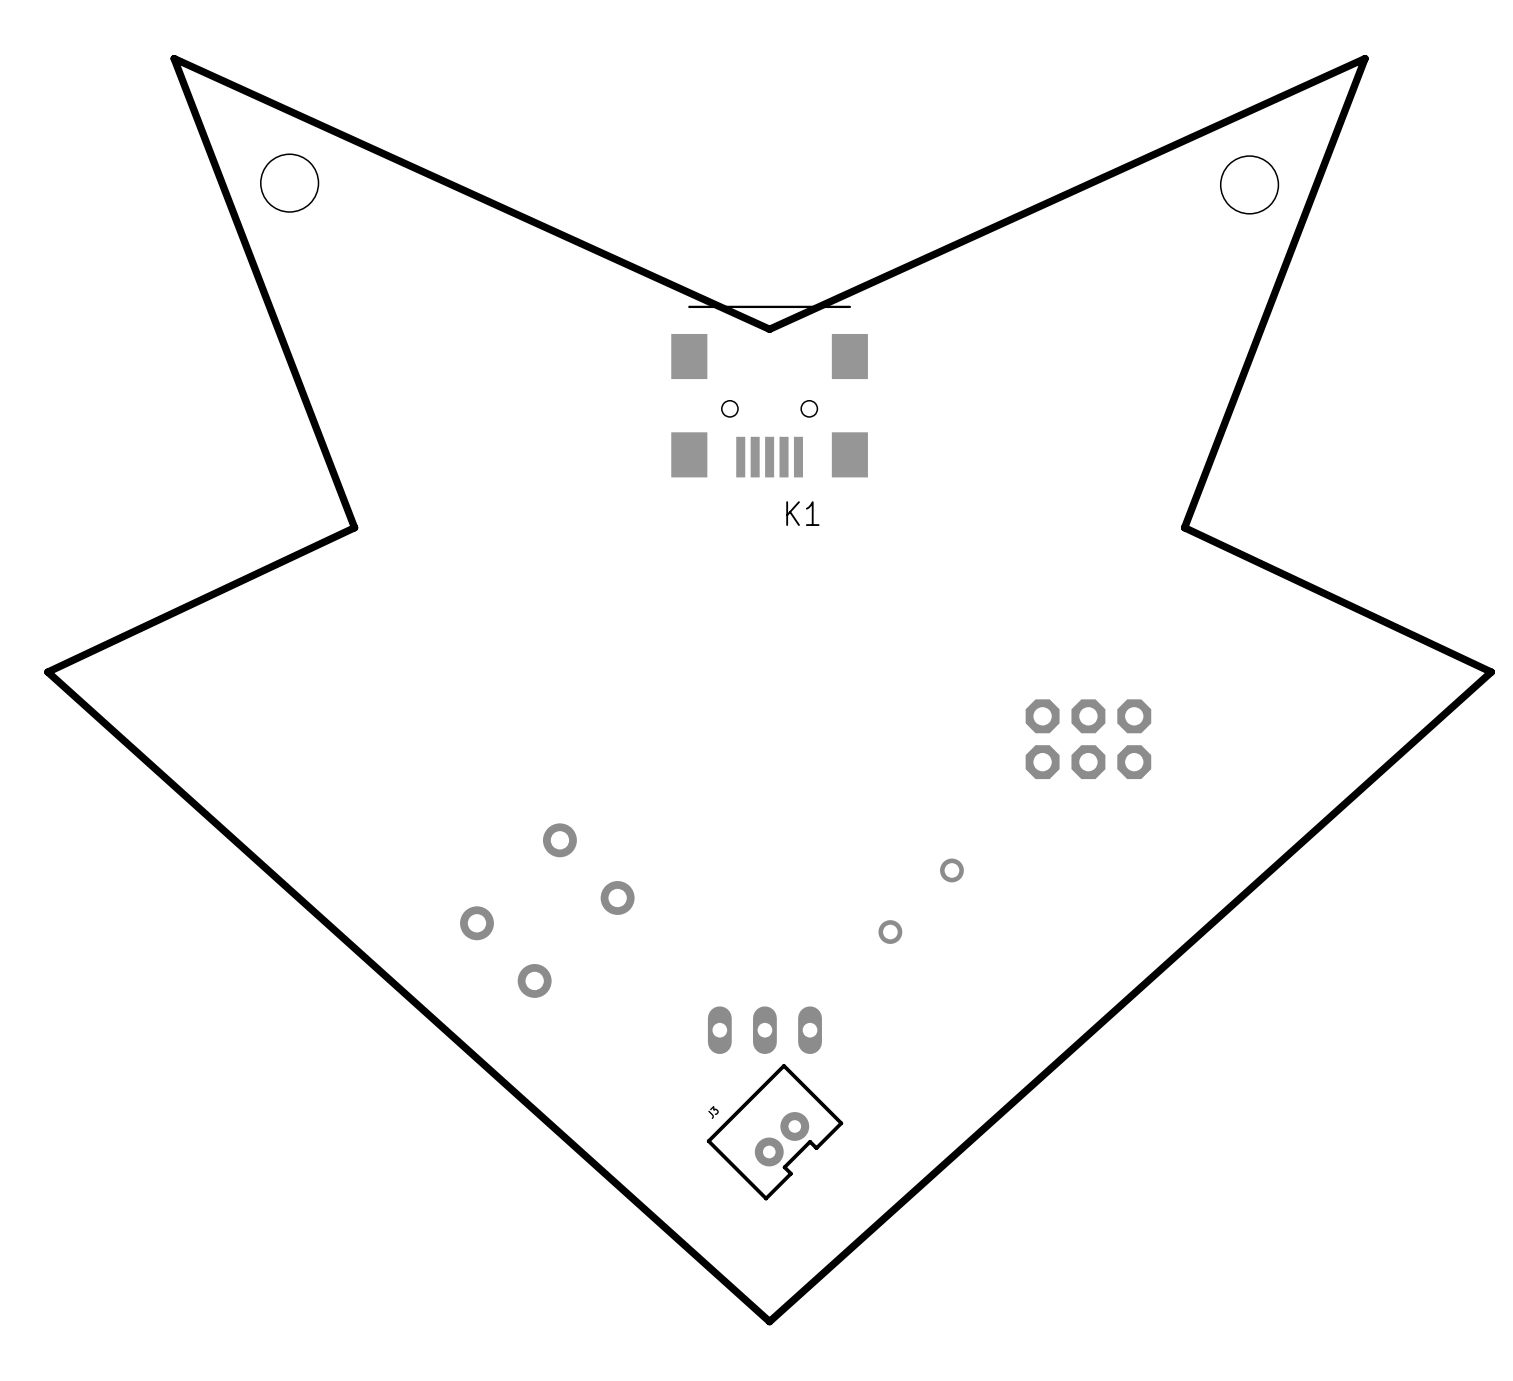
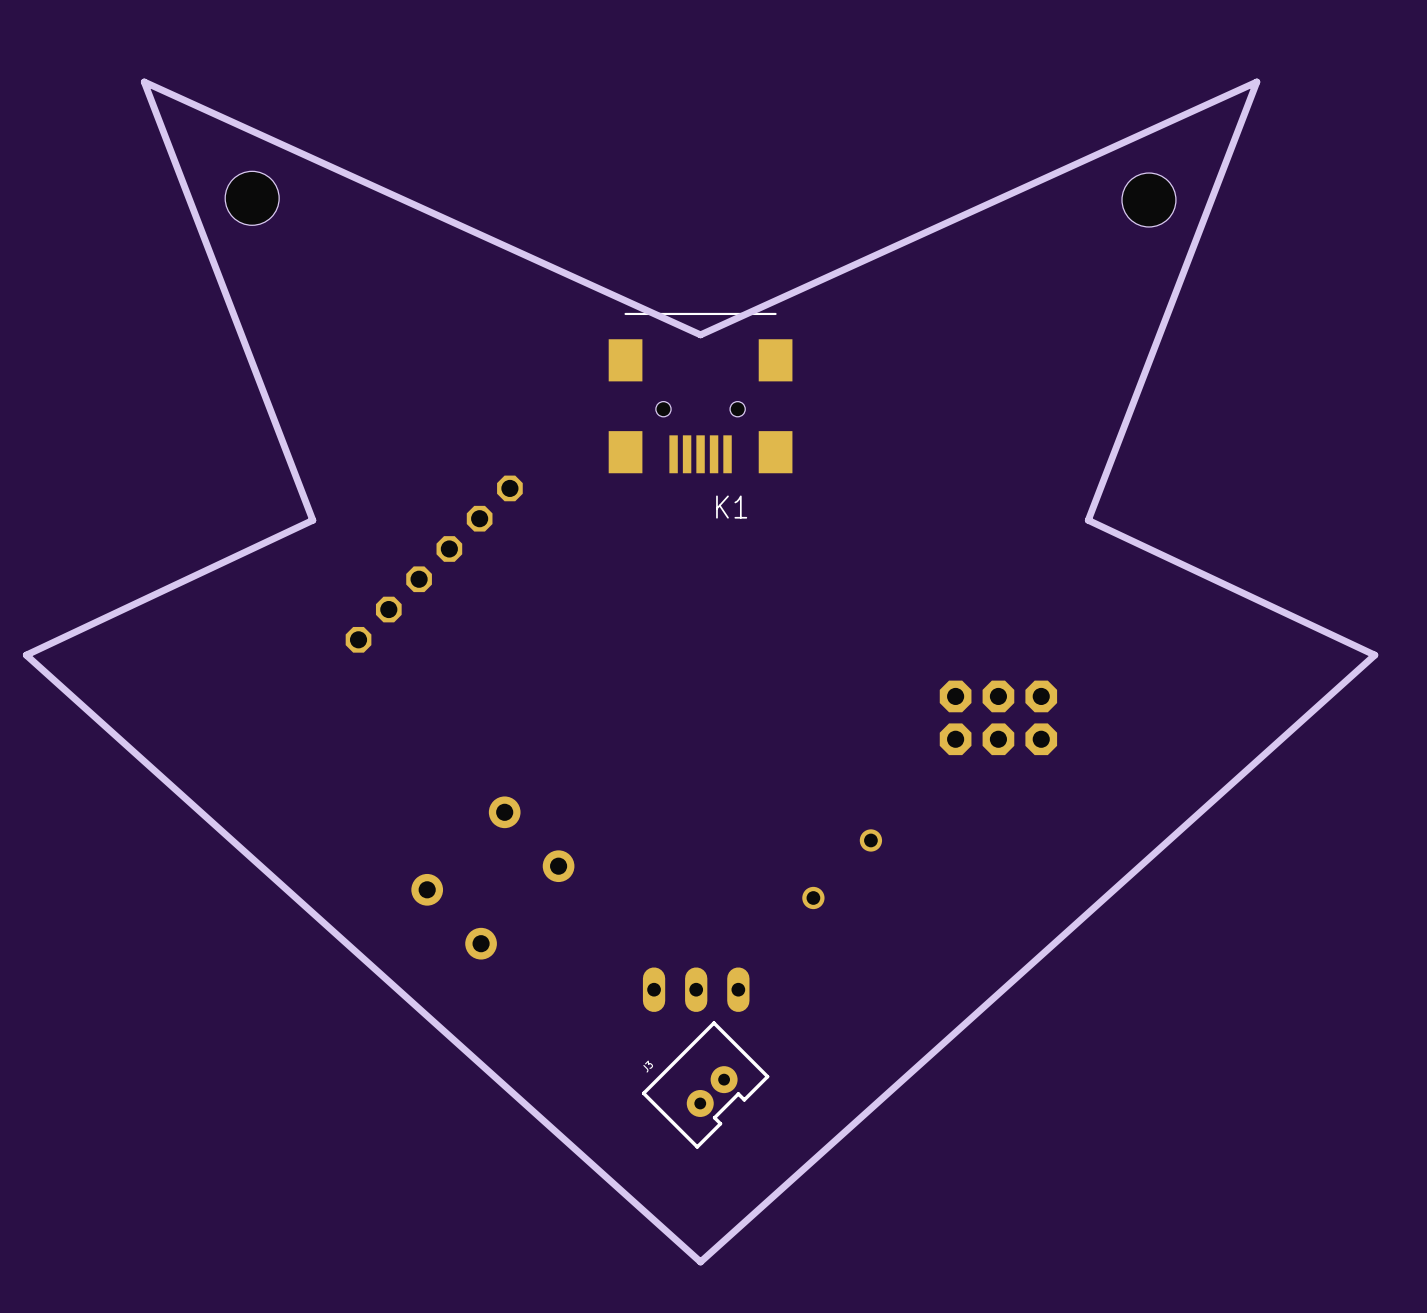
part: none -> (434, 564)

